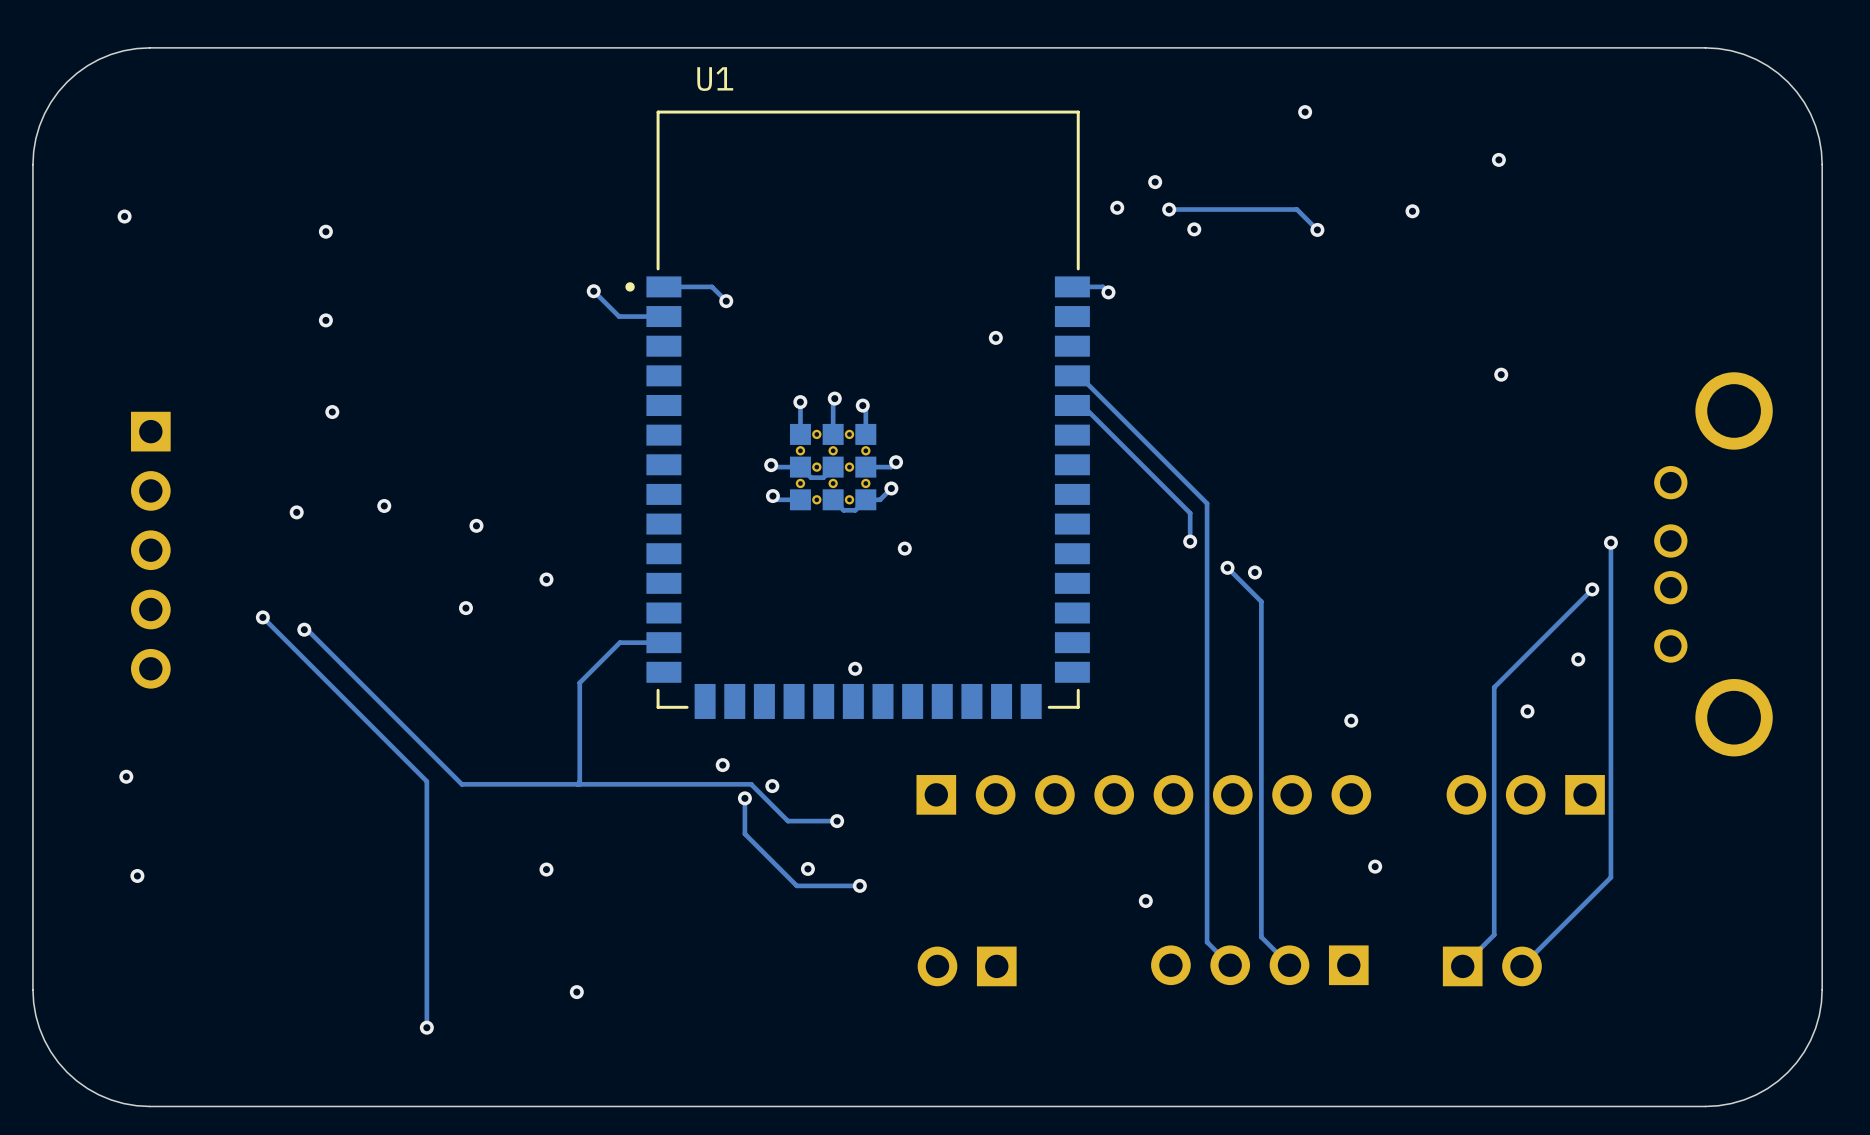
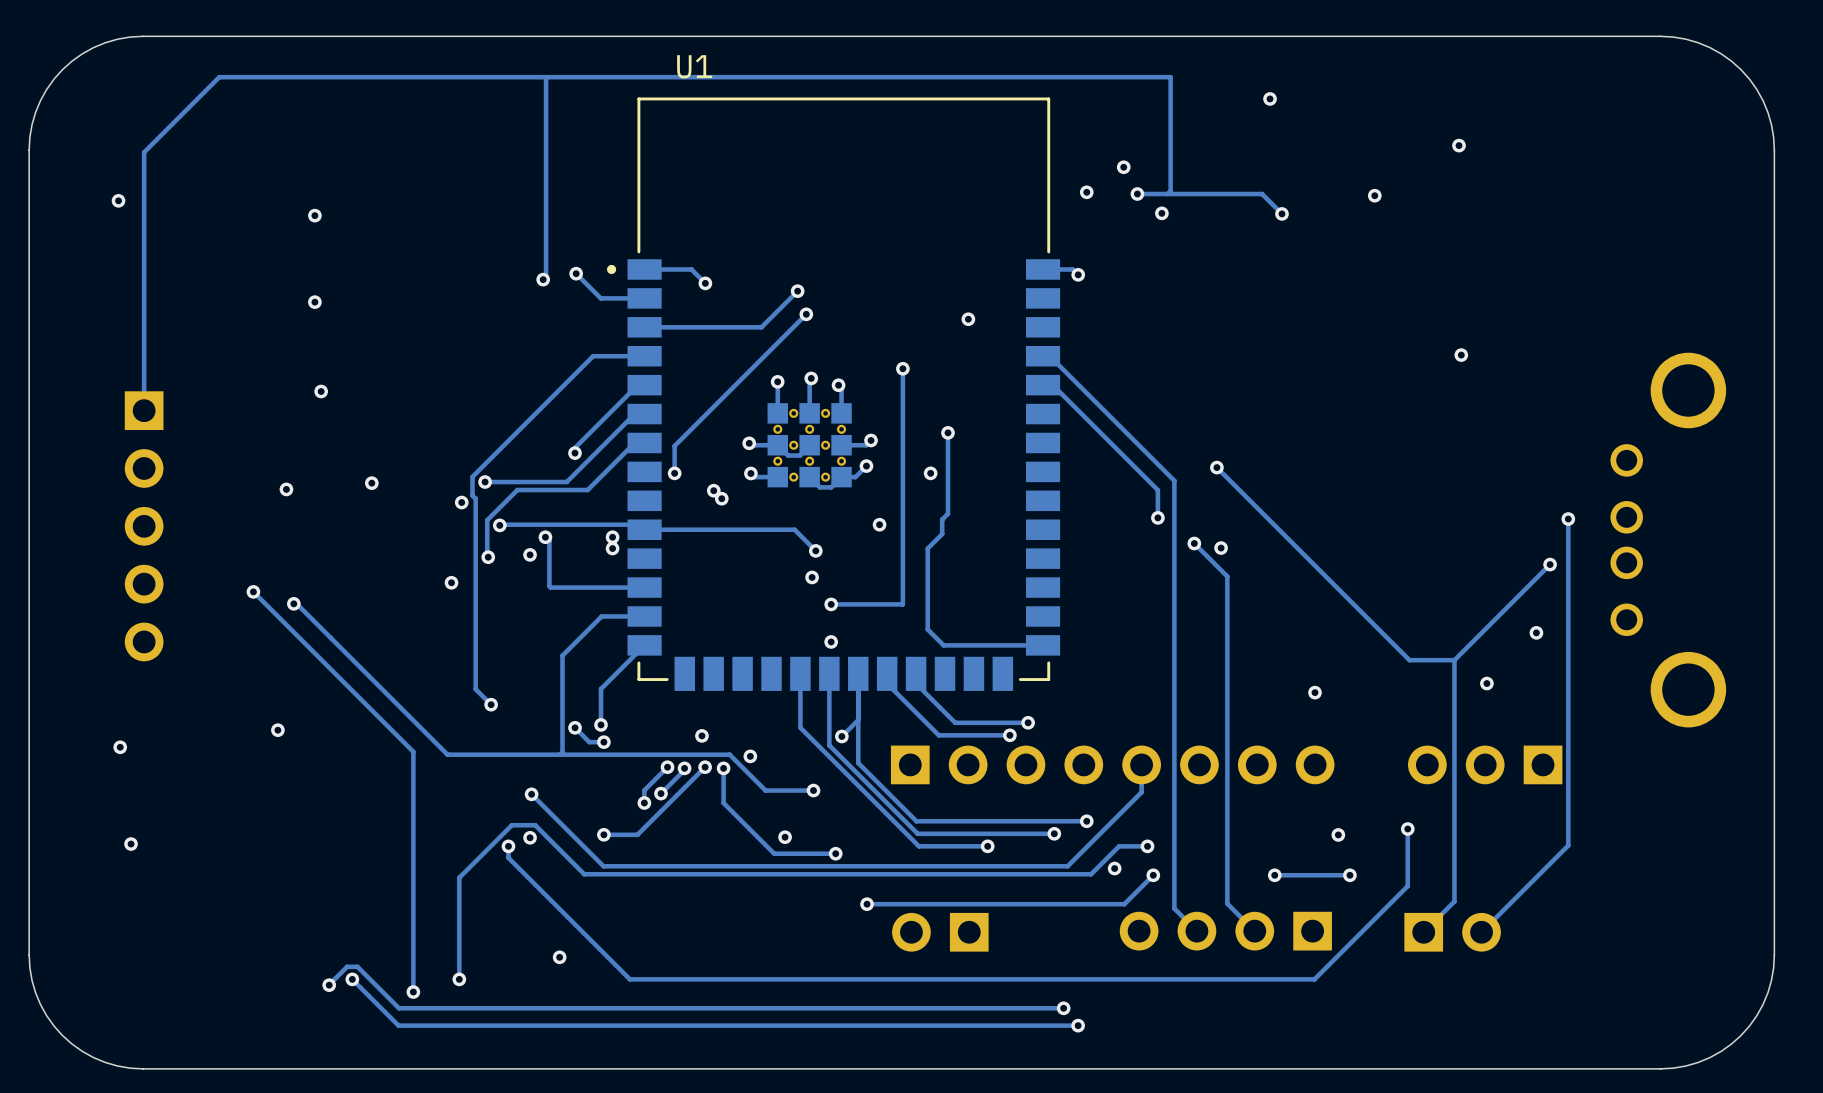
track: none -> (546, 77) (546, 276) (543, 279)
track: none -> (1167, 194) (1170, 191) (1170, 77) (219, 77) (144, 152) (144, 410)
via: none -> (543, 279)
track: none -> (797, 291) (761, 327) (644, 327)
via: none -> (797, 291)
track: none -> (806, 314) (674, 445) (674, 473)
via: none -> (806, 314)
track: none -> (644, 356) (593, 356) (472, 476) (472, 495) (475, 498) (475, 689) (491, 704)
track: none -> (902, 368) (902, 604)
via: none -> (902, 368)
track: none -> (644, 385) (637, 385) (574, 447) (574, 453)
track: none -> (644, 414) (634, 414) (566, 482) (485, 482)
track: none -> (948, 432) (948, 513) (942, 519) (942, 534) (927, 548) (927, 629) (943, 645) (1043, 645)
via: none -> (948, 432)
track: none -> (644, 442) (634, 442) (587, 490) (517, 490) (487, 520) (488, 557)
via: none -> (574, 453)
track: none -> (1216, 467) (1409, 660) (1454, 660)
via: none -> (1216, 467)
via: none -> (674, 473)
via: none -> (930, 473)
via: none -> (485, 482)
via: none -> (713, 490)
via: none -> (721, 498)
track: none -> (499, 525) (639, 524) (644, 529) (794, 529) (815, 550)
via: none -> (499, 525)
track: none -> (545, 537) (549, 541) (550, 587) (644, 587)
via: none -> (545, 537)
via: none -> (612, 537)
via: none -> (612, 548)
via: none -> (815, 550)
via: none -> (488, 557)
via: none -> (812, 577)
via: none -> (831, 604)
track: none -> (902, 604) (831, 604)
track: none -> (644, 645) (601, 688) (601, 724)
track: none -> (800, 673) (800, 727) (918, 846) (987, 846)
track: none -> (829, 673) (829, 745) (917, 833) (1054, 833)
track: none -> (858, 673) (858, 763) (916, 821) (1086, 821)
track: none -> (887, 673) (887, 683) (938, 735) (1009, 735)
track: none -> (916, 673) (916, 683) (955, 722) (1028, 722)
via: none -> (491, 704)
track: none -> (858, 720) (841, 736)
via: none -> (1028, 722)
via: none -> (601, 724)
track: none -> (575, 727) (589, 742) (603, 742)
via: none -> (575, 727)
via: none -> (277, 730)
via: none -> (1009, 735)
via: none -> (841, 736)
via: none -> (603, 742)
track: none -> (1141, 764) (1141, 792) (1067, 866) (603, 866) (531, 794)
track: none -> (667, 767) (644, 790) (644, 802)
via: none -> (667, 767)
track: none -> (705, 767) (637, 834) (603, 834)
via: none -> (705, 767)
track: none -> (684, 768) (661, 793)
via: none -> (684, 768)
via: none -> (531, 794)
via: none -> (661, 793)
via: none -> (644, 802)
via: none -> (1086, 821)
track: none -> (1407, 829) (1407, 886) (1314, 979) (629, 979) (508, 857) (508, 846)
via: none -> (1407, 829)
via: none -> (1054, 833)
via: none -> (603, 834)
via: none -> (508, 846)
via: none -> (987, 846)
track: none -> (1147, 846) (1119, 846) (1091, 874) (584, 874) (535, 825) (511, 825) (459, 877) (459, 979)
via: none -> (1147, 846)
track: none -> (1153, 875) (1124, 904) (867, 904)
via: none -> (1153, 875)
via: none -> (1274, 875)
track: none -> (1349, 875) (1274, 875)
via: none -> (1349, 875)
via: none -> (867, 904)
track: none -> (352, 979) (398, 1025) (1078, 1025)
via: none -> (352, 979)
via: none -> (459, 979)
track: none -> (329, 984) (347, 966) (357, 966) (398, 1008) (1063, 1008)
via: none -> (329, 985)
via: none -> (1063, 1008)
via: none -> (1078, 1025)

